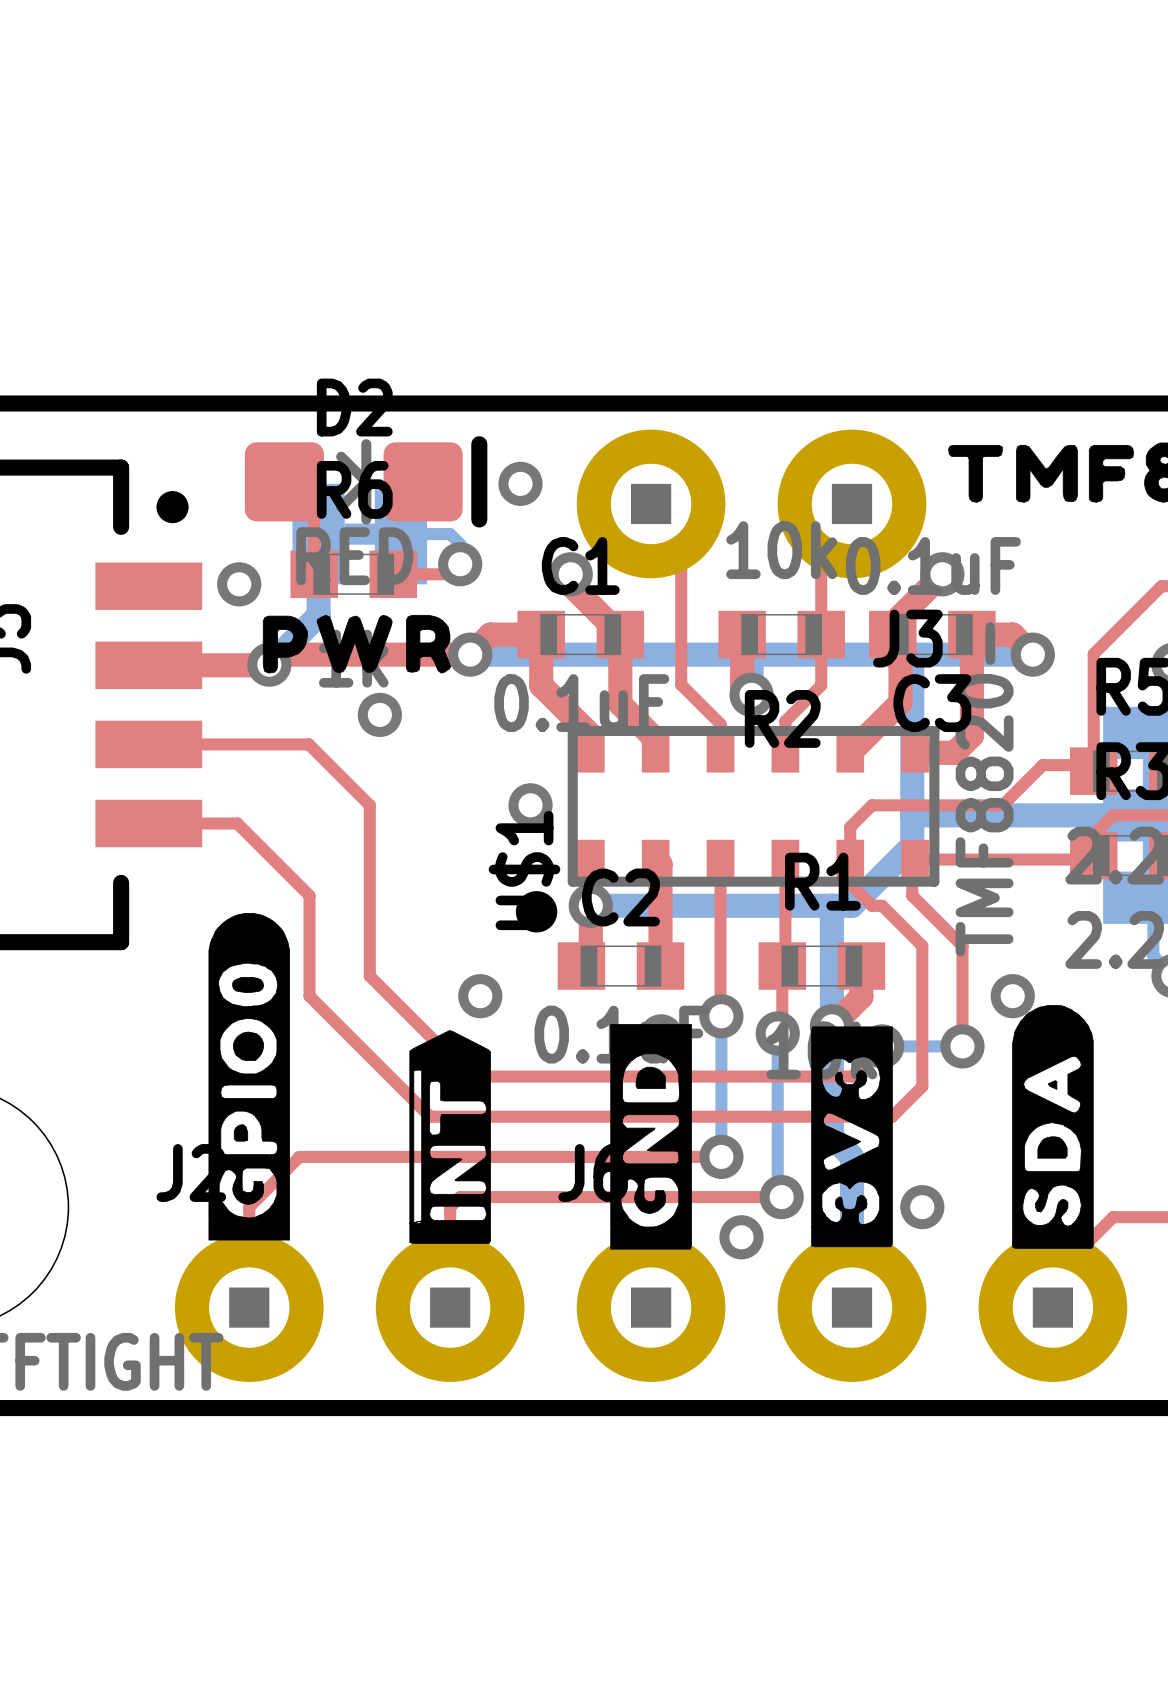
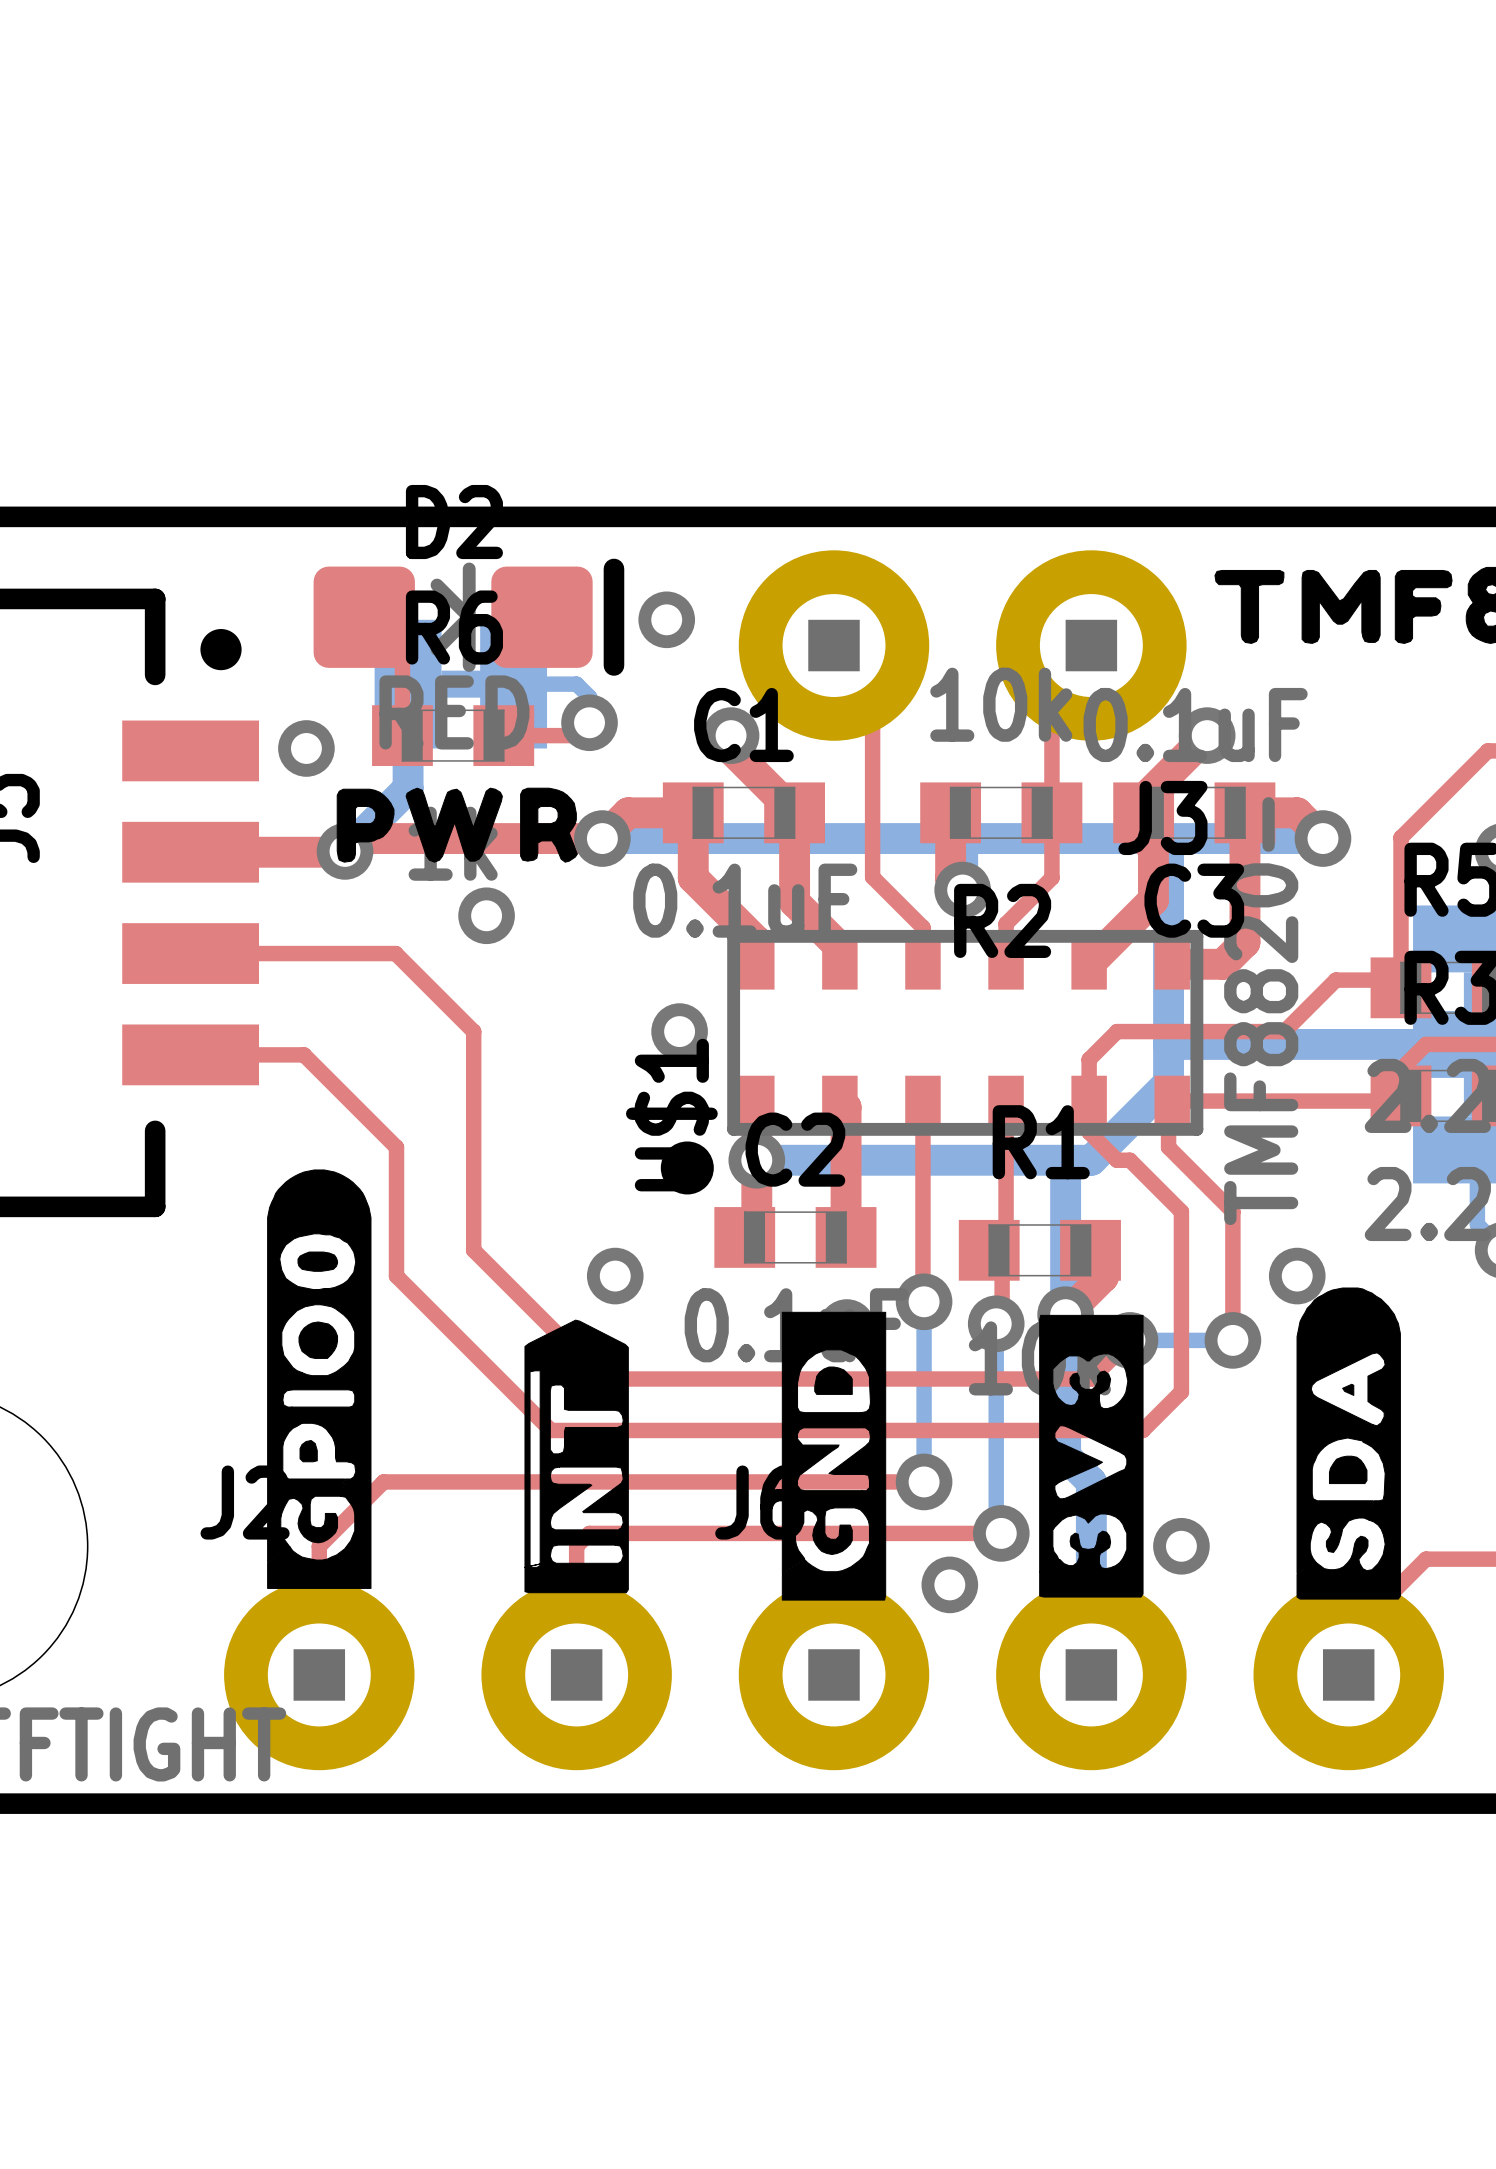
R1 position: (821, 966) -> (1039, 1250)

